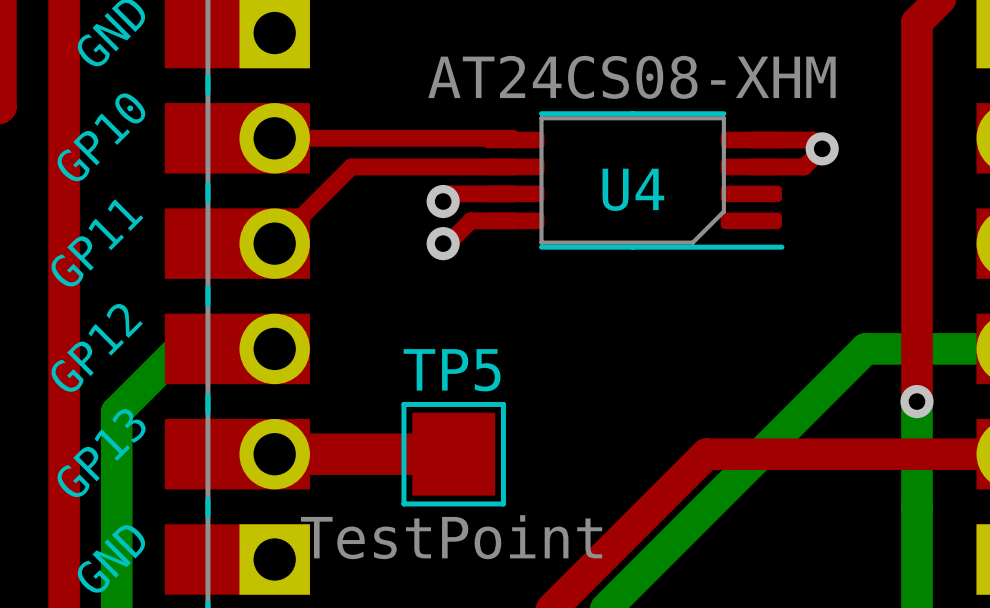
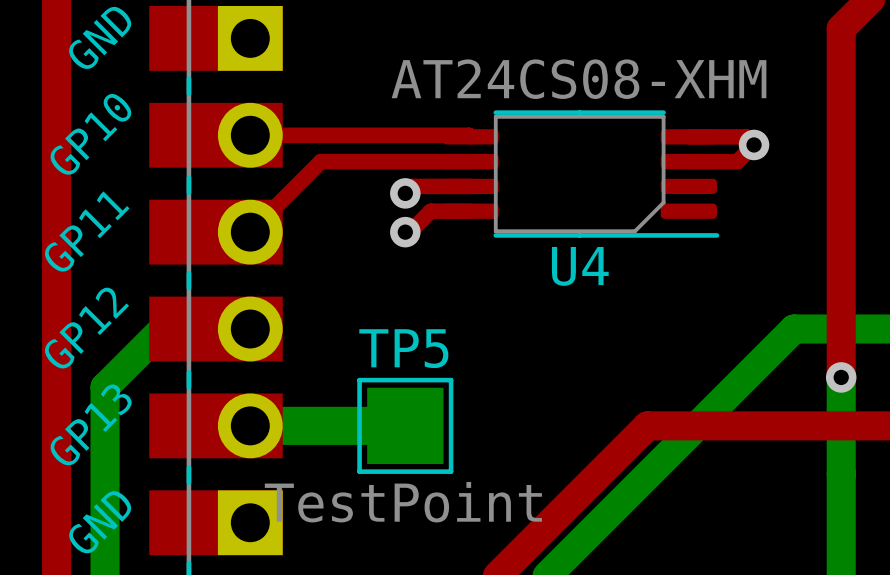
U4 name position: U4 (633, 189) -> U4 (580, 266)
TP5 footprint: [401, 401, 506, 507] -> [357, 377, 454, 474]
top track: (274, 454) (443, 454) -> none
bottom track: none -> (250, 425) (405, 425)

